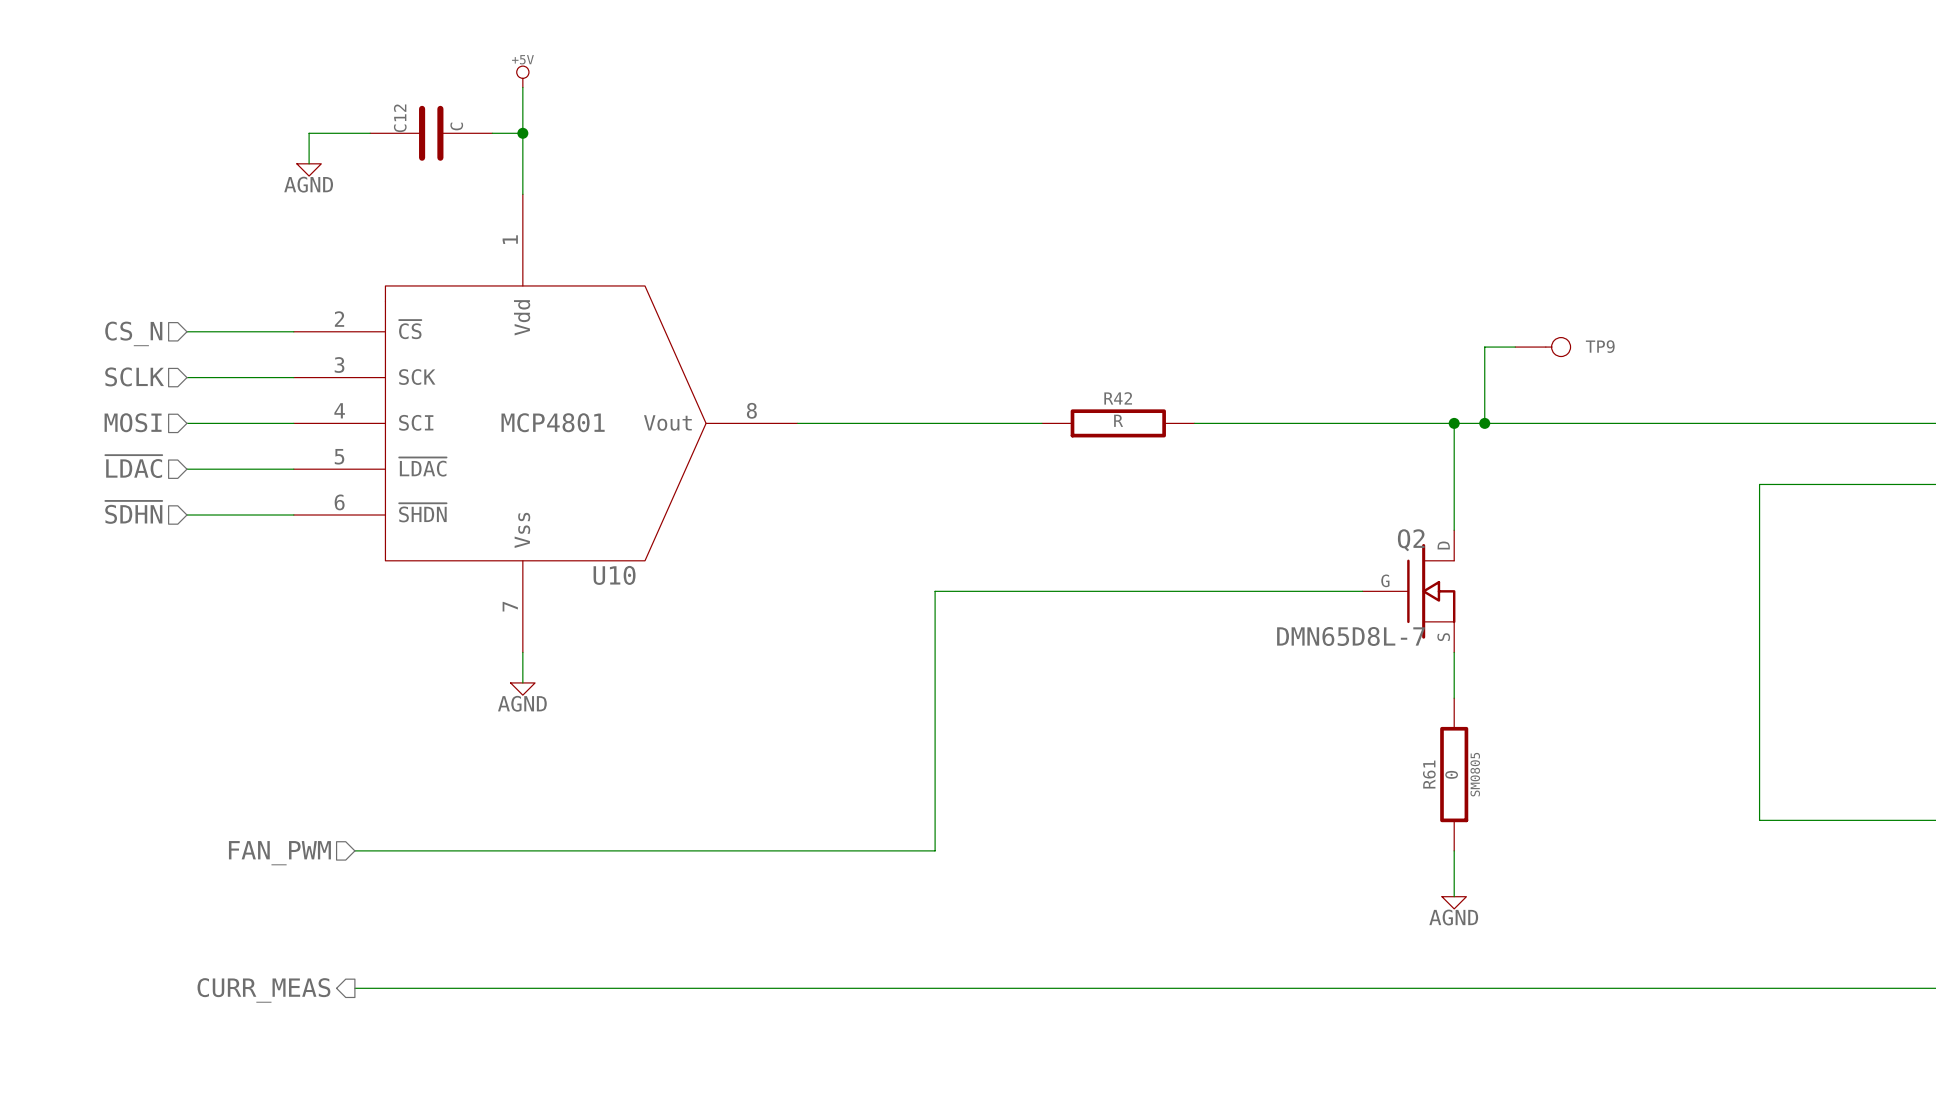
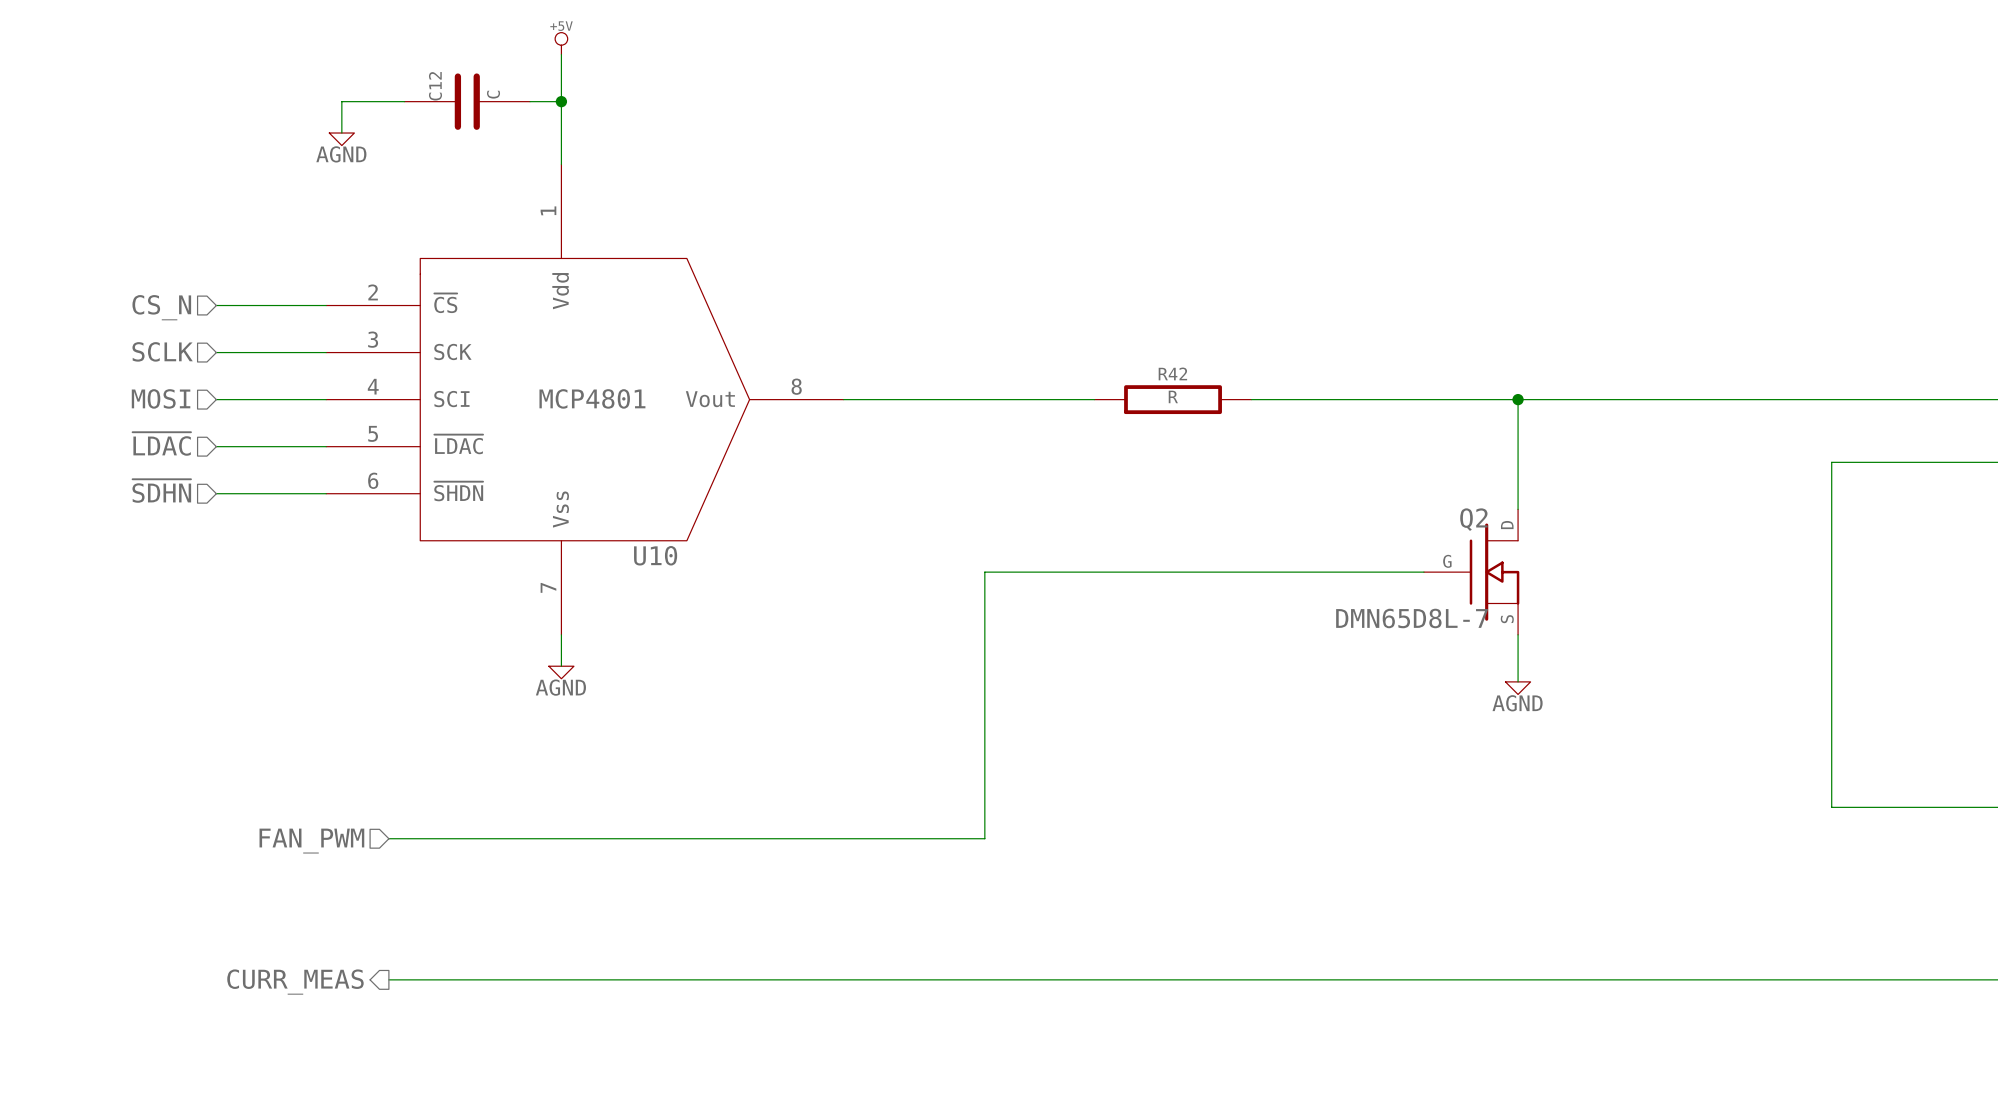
wire: (1515, 347) (1484, 347) (1484, 423) -> none
TP9: (1542, 347) -> none
junction: (1484, 423) -> none
R61: 0 (1454, 774) -> none
wire: (1454, 850) (1454, 896) -> none
power symbol position: AGND (1454, 902) -> AGND (1518, 688)

